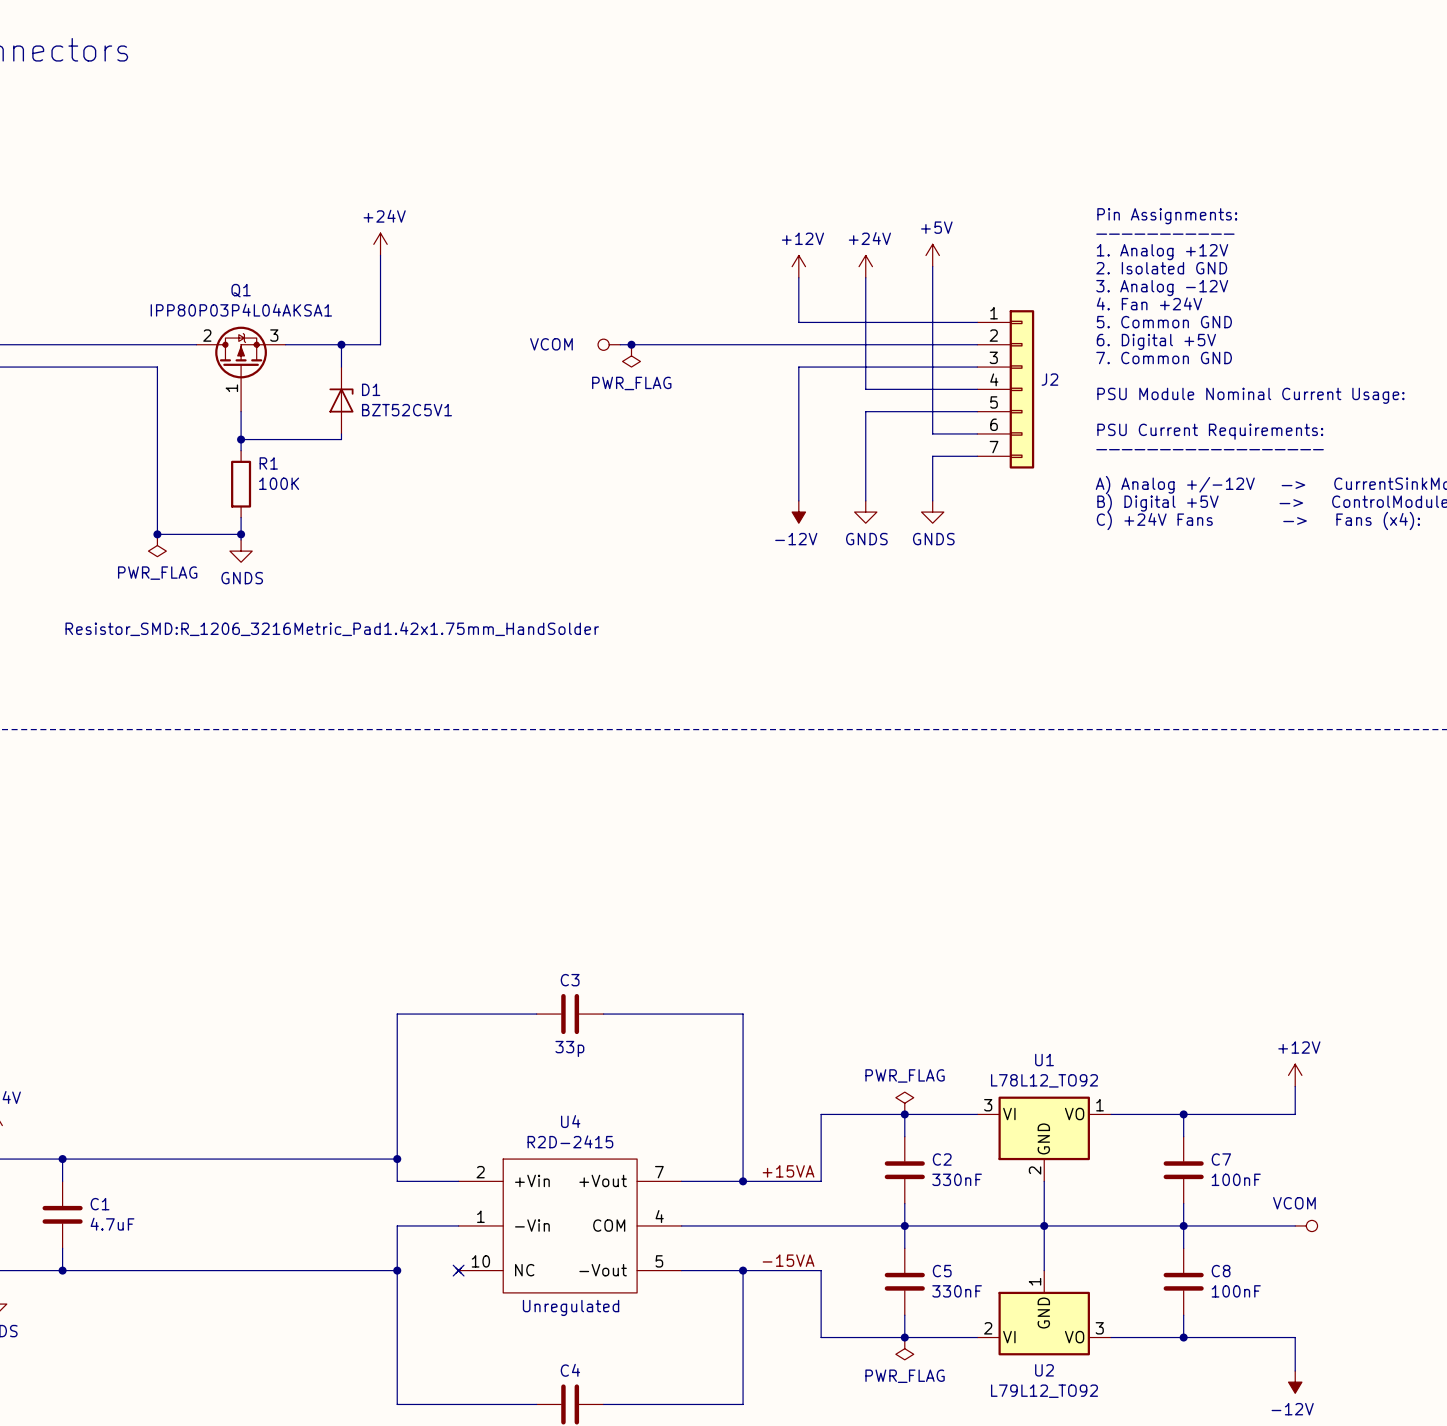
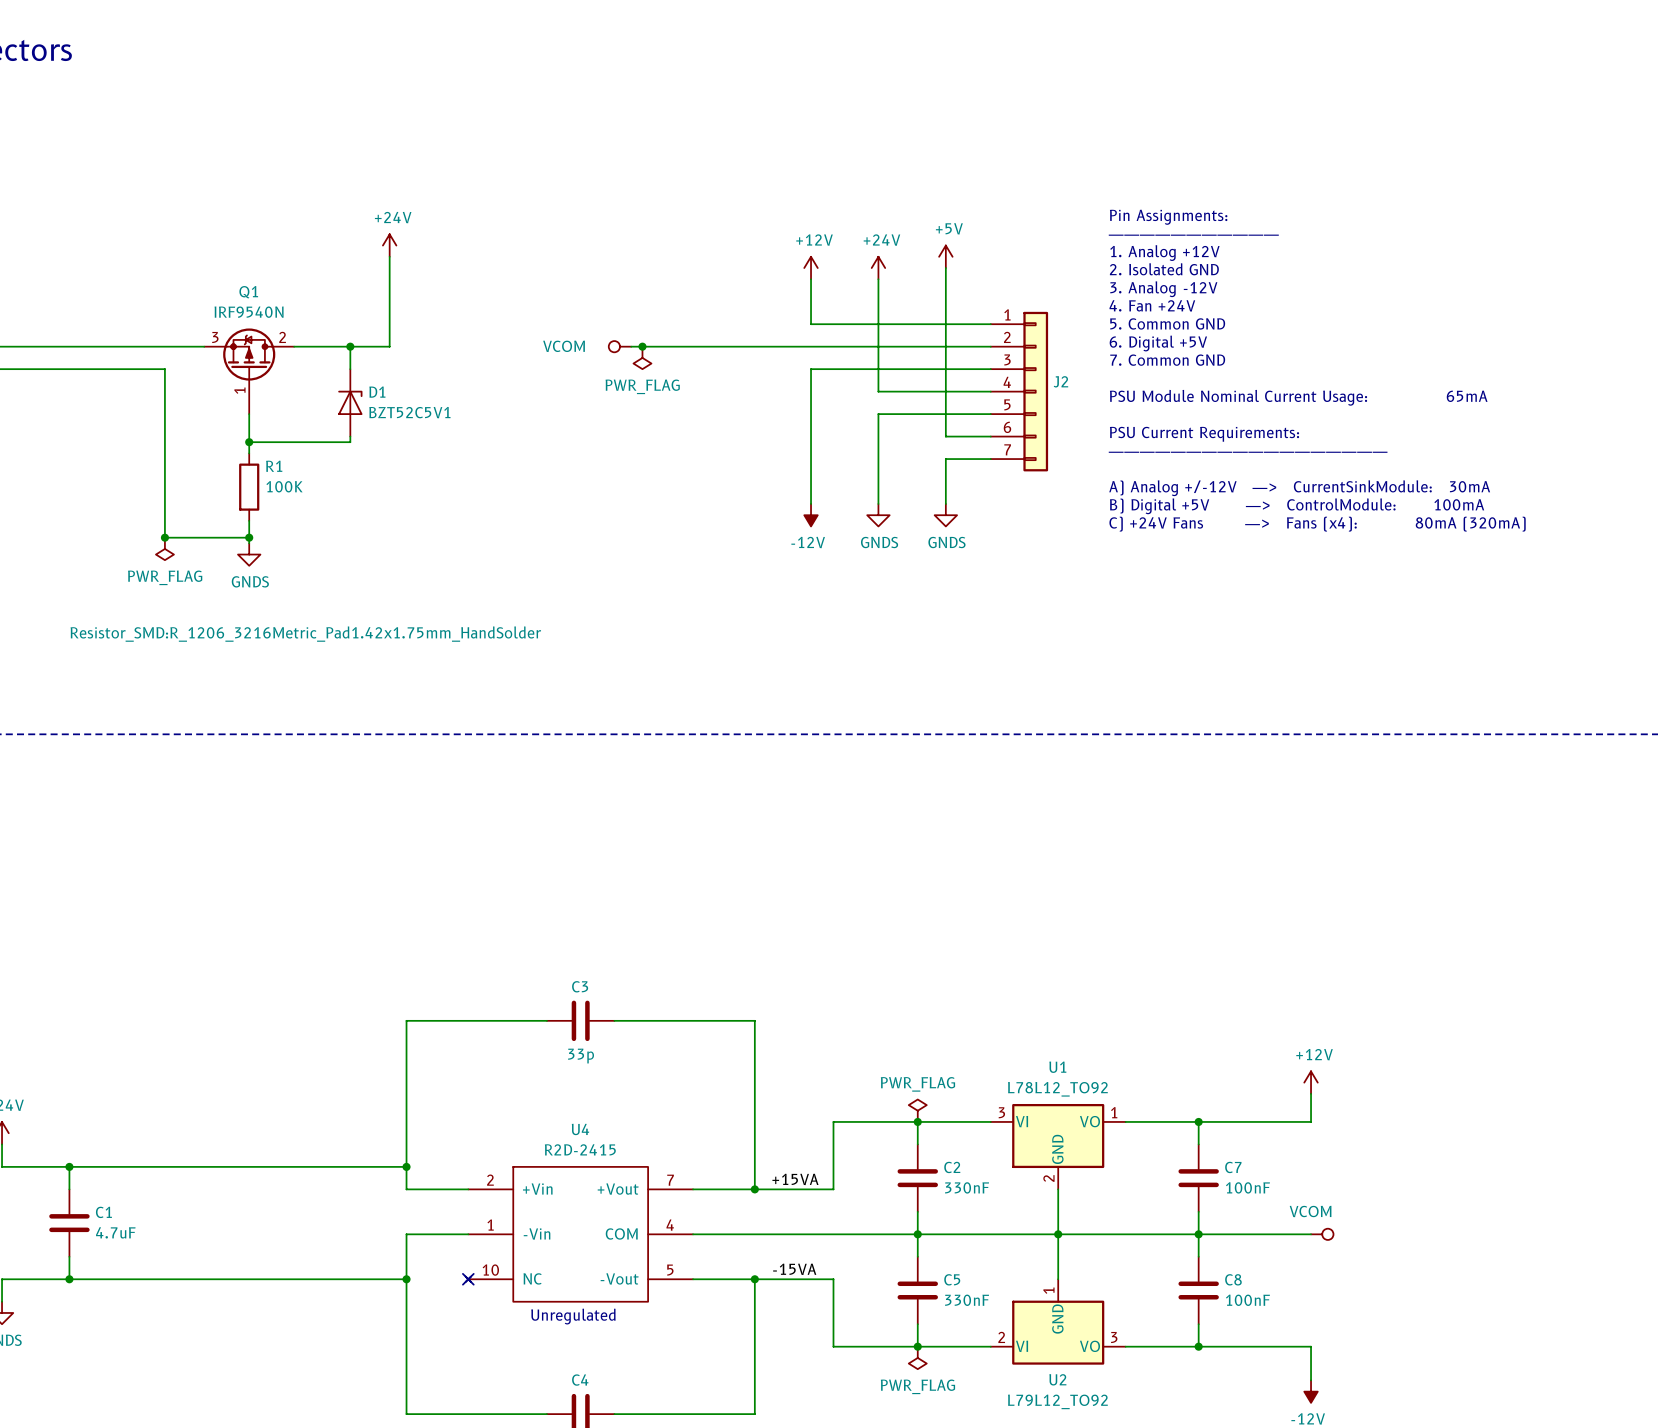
Q1 value: IPP80P03P4L04AKSA1 (241, 310) -> IRF9540N (249, 312)
Q1 flip: as is (241, 352) -> left-right (249, 354)

